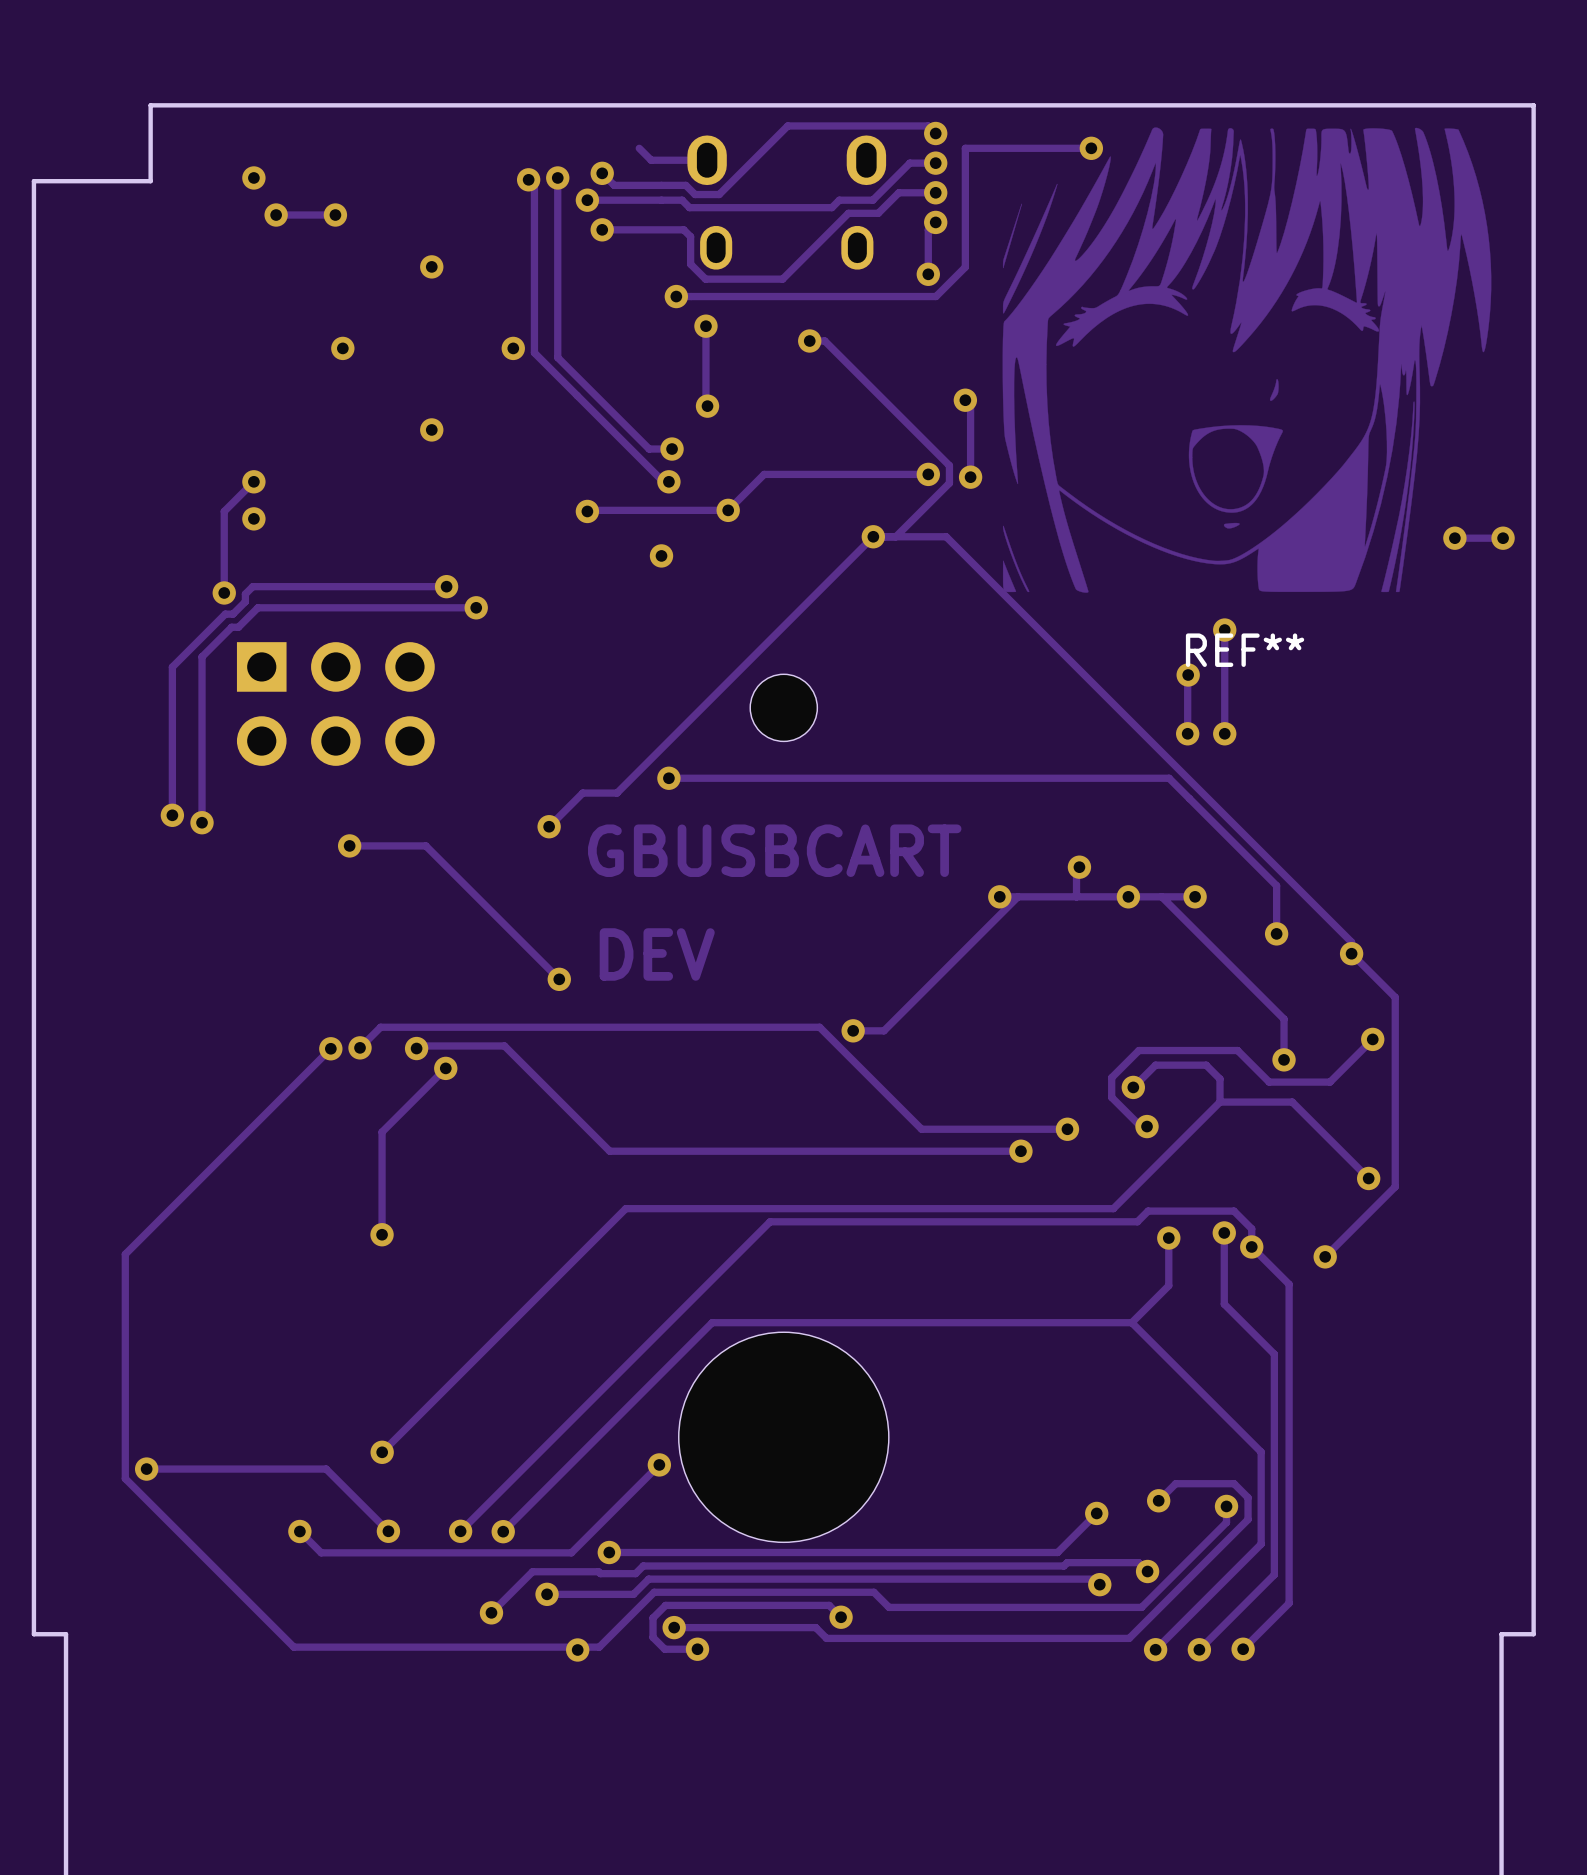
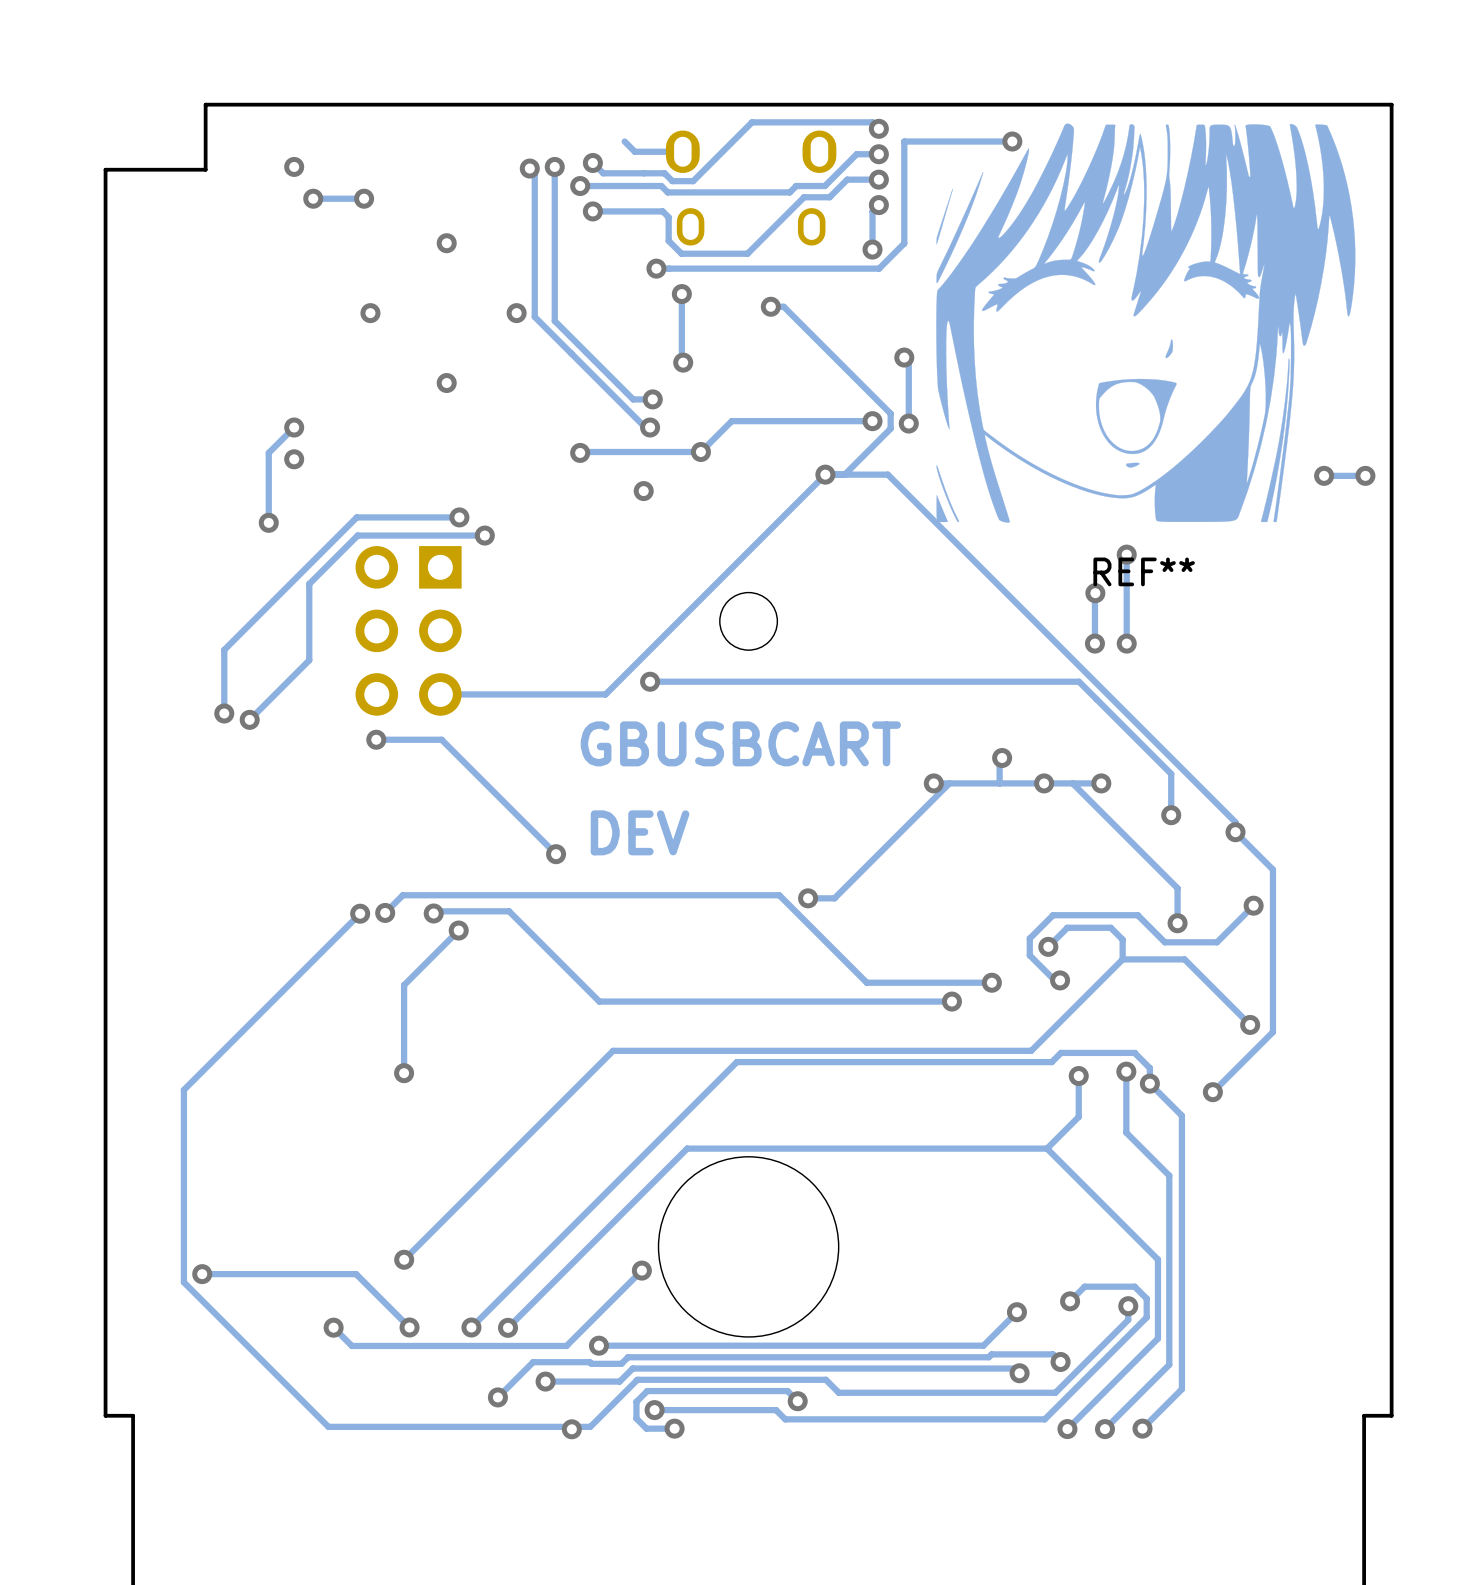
track: (326, 586) (252, 586) (245, 594) (245, 601) (233, 614) (225, 614) (172, 667) (172, 741) -> (356, 517) (224, 649)
track: (328, 607) (257, 607) (238, 627) (231, 627) (202, 656) (202, 822) -> (357, 535) (309, 584) (309, 660) (249, 719)
part rotation: 0° (335, 703) -> 90° clockwise (408, 630)
track: (582, 793) (549, 826) -> (576, 694) (440, 694)
via: (549, 826) -> none

